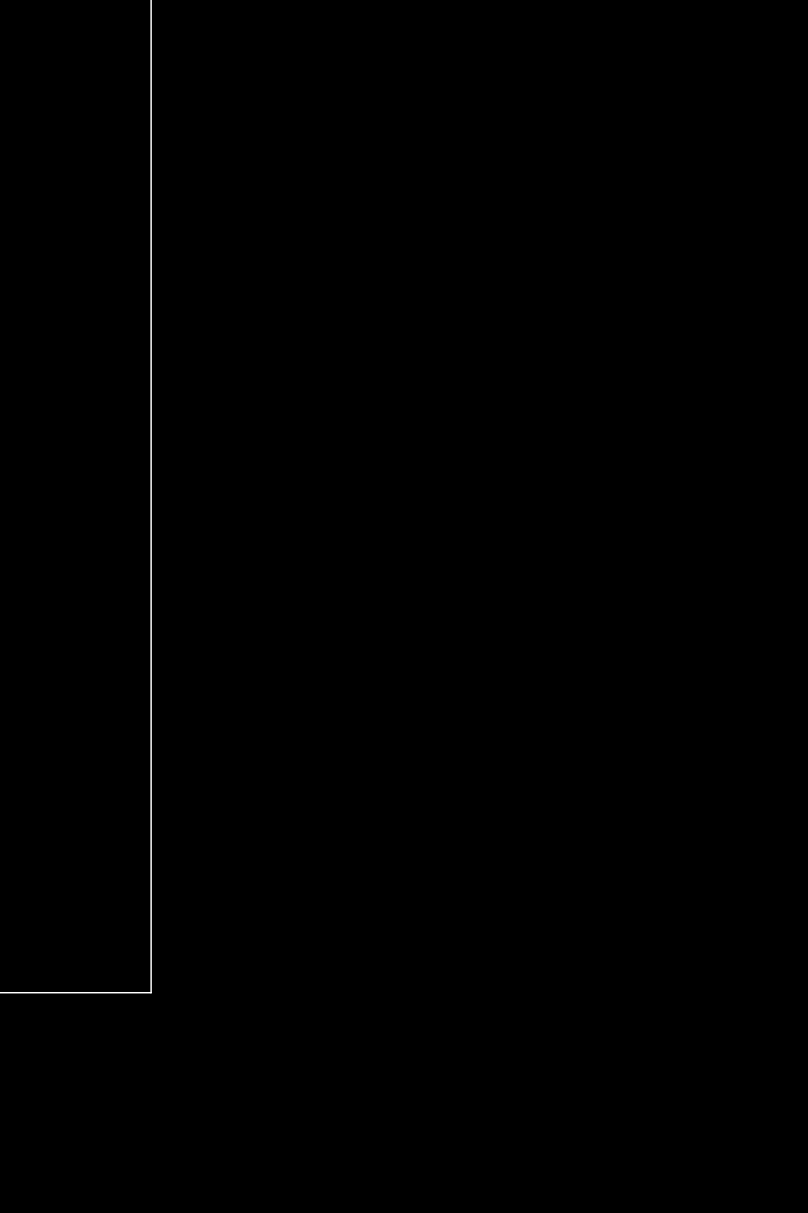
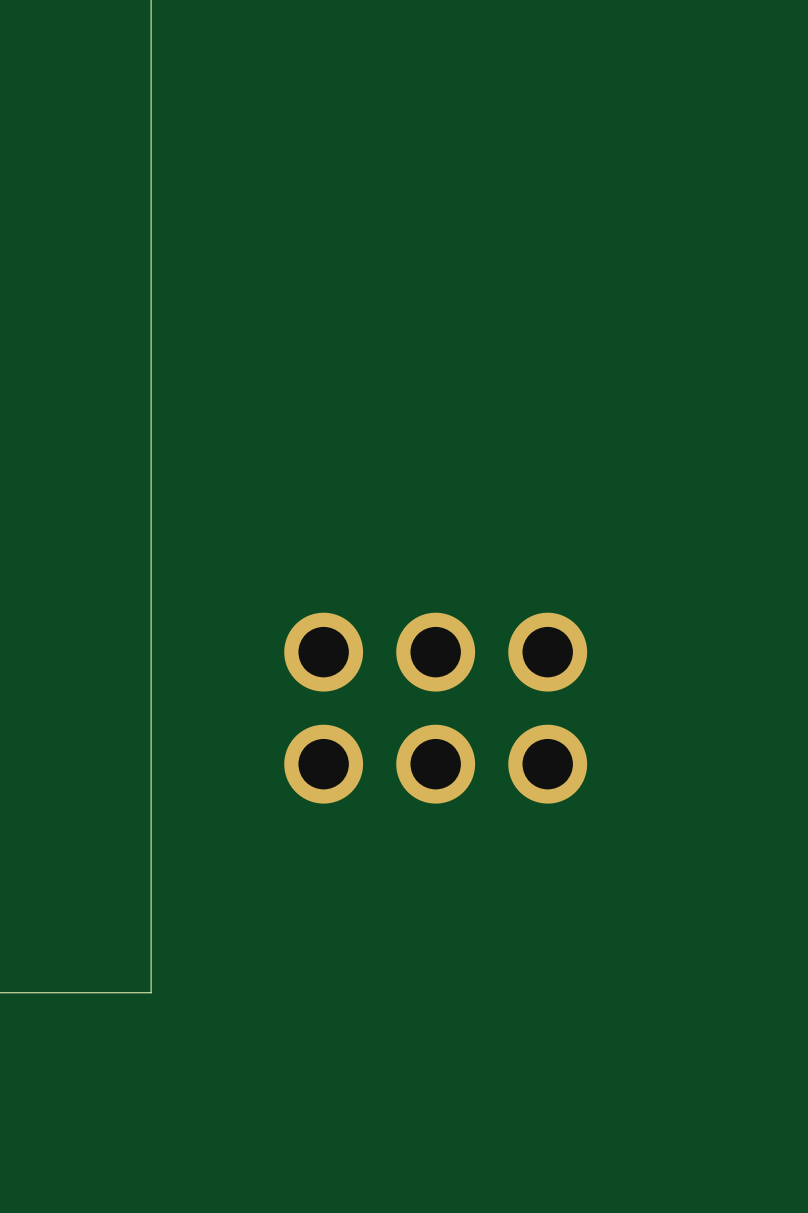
part: none -> (435, 708)

